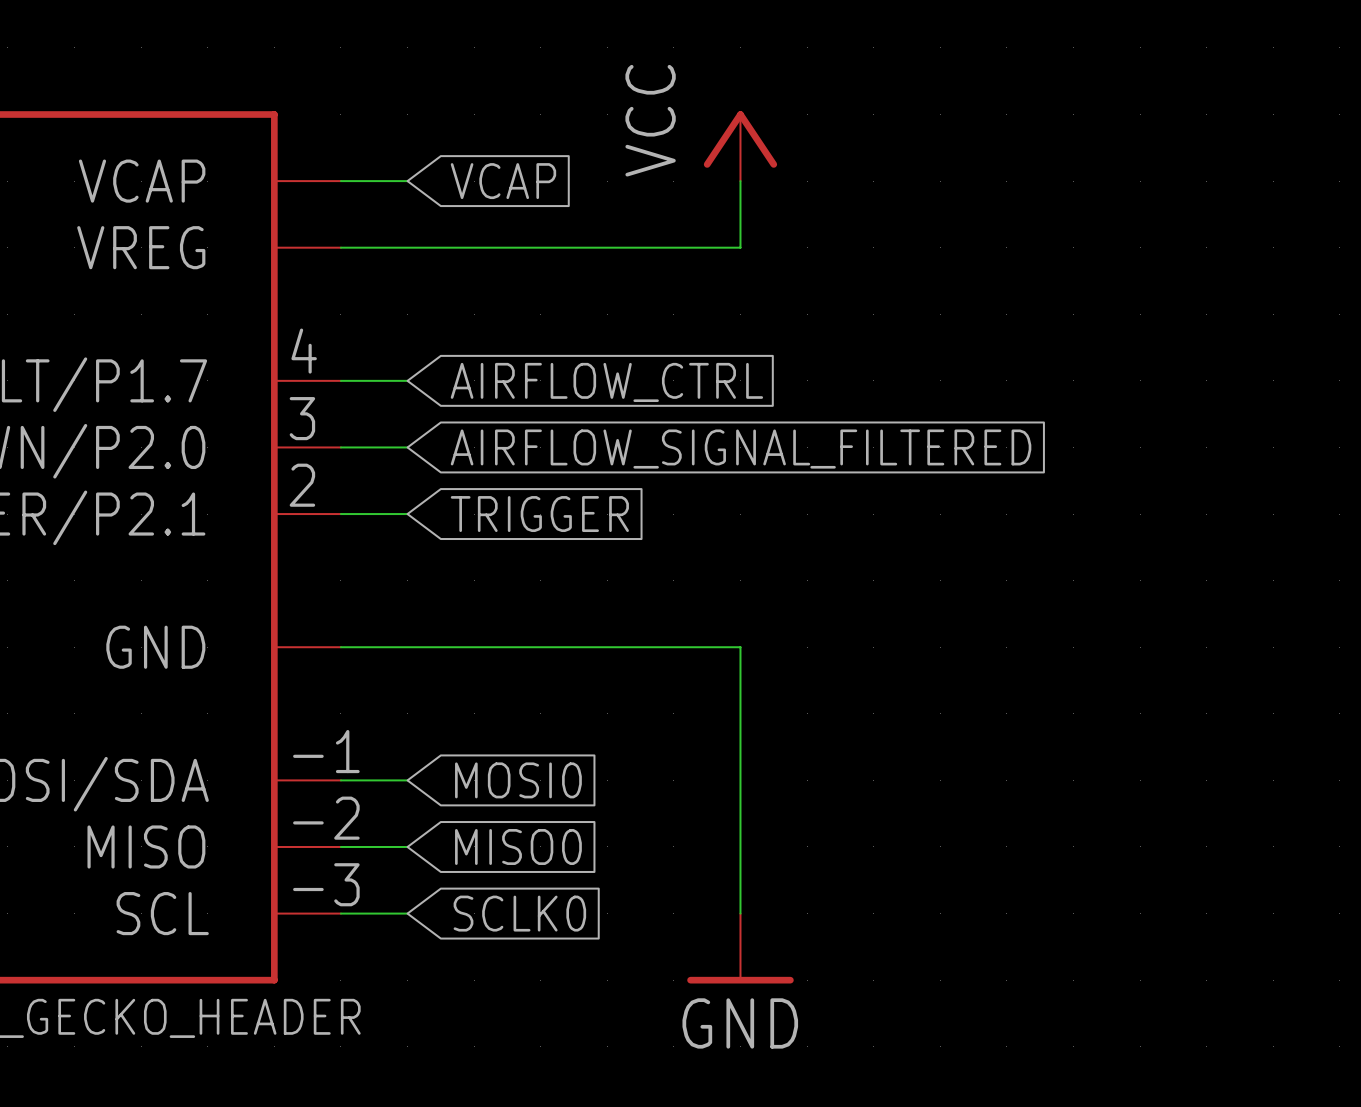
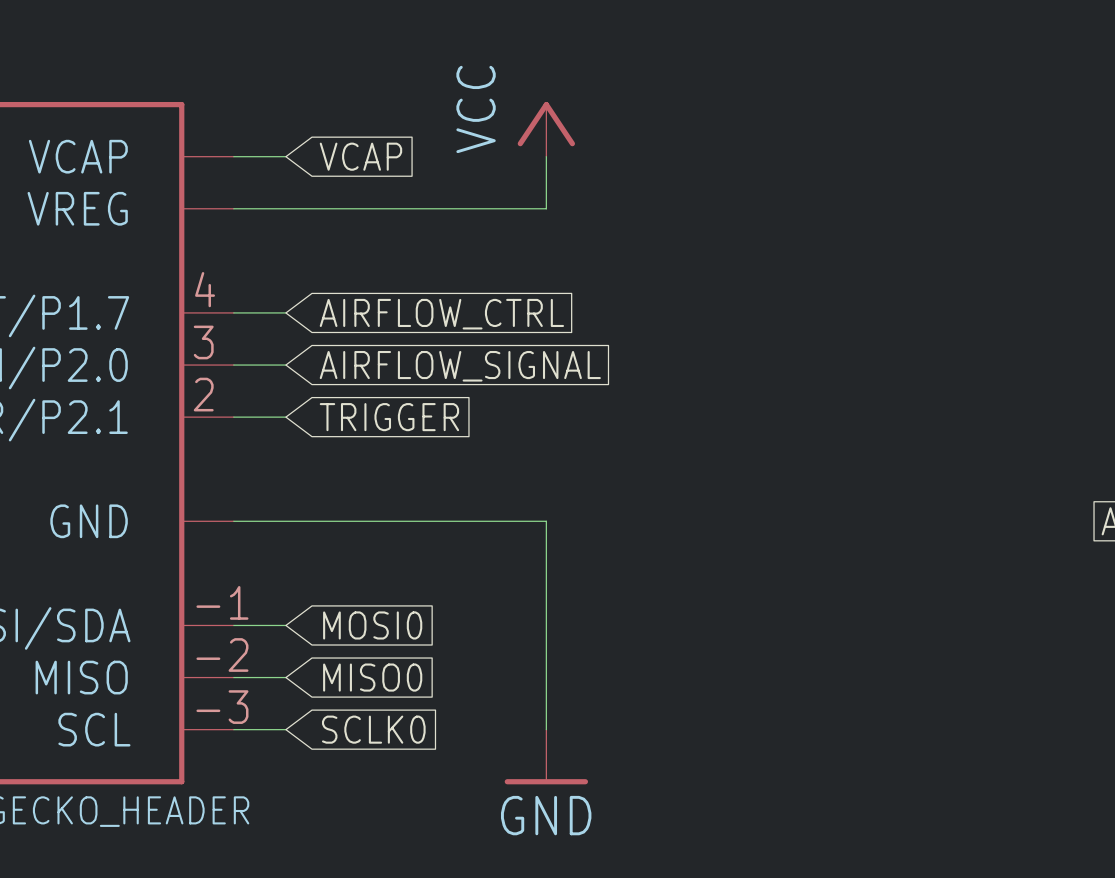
global label: AIRFLOW_SIGNAL_FILTERED (741, 449) -> AIRFLOW_SIGNAL (460, 366)

